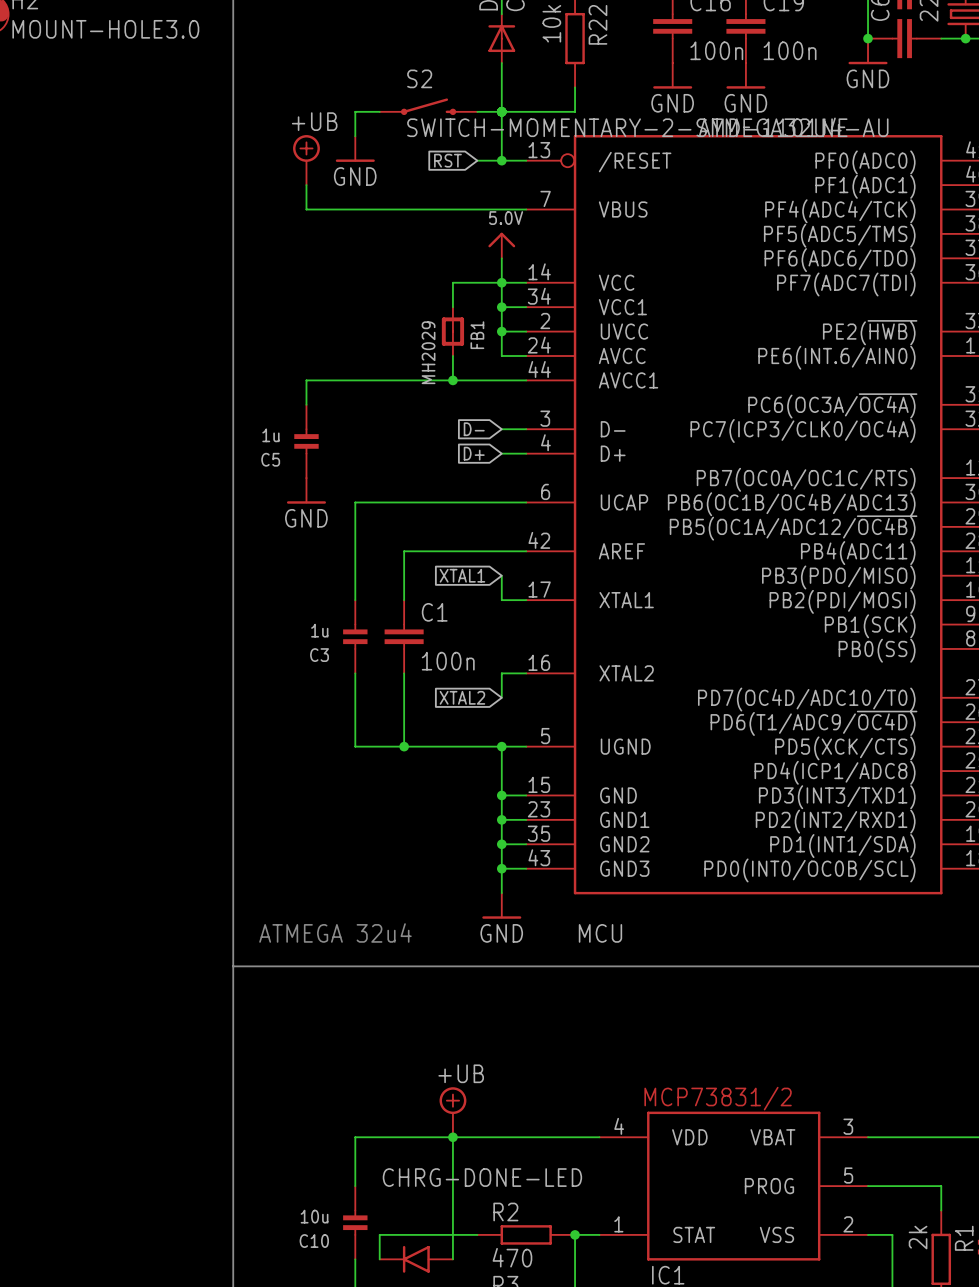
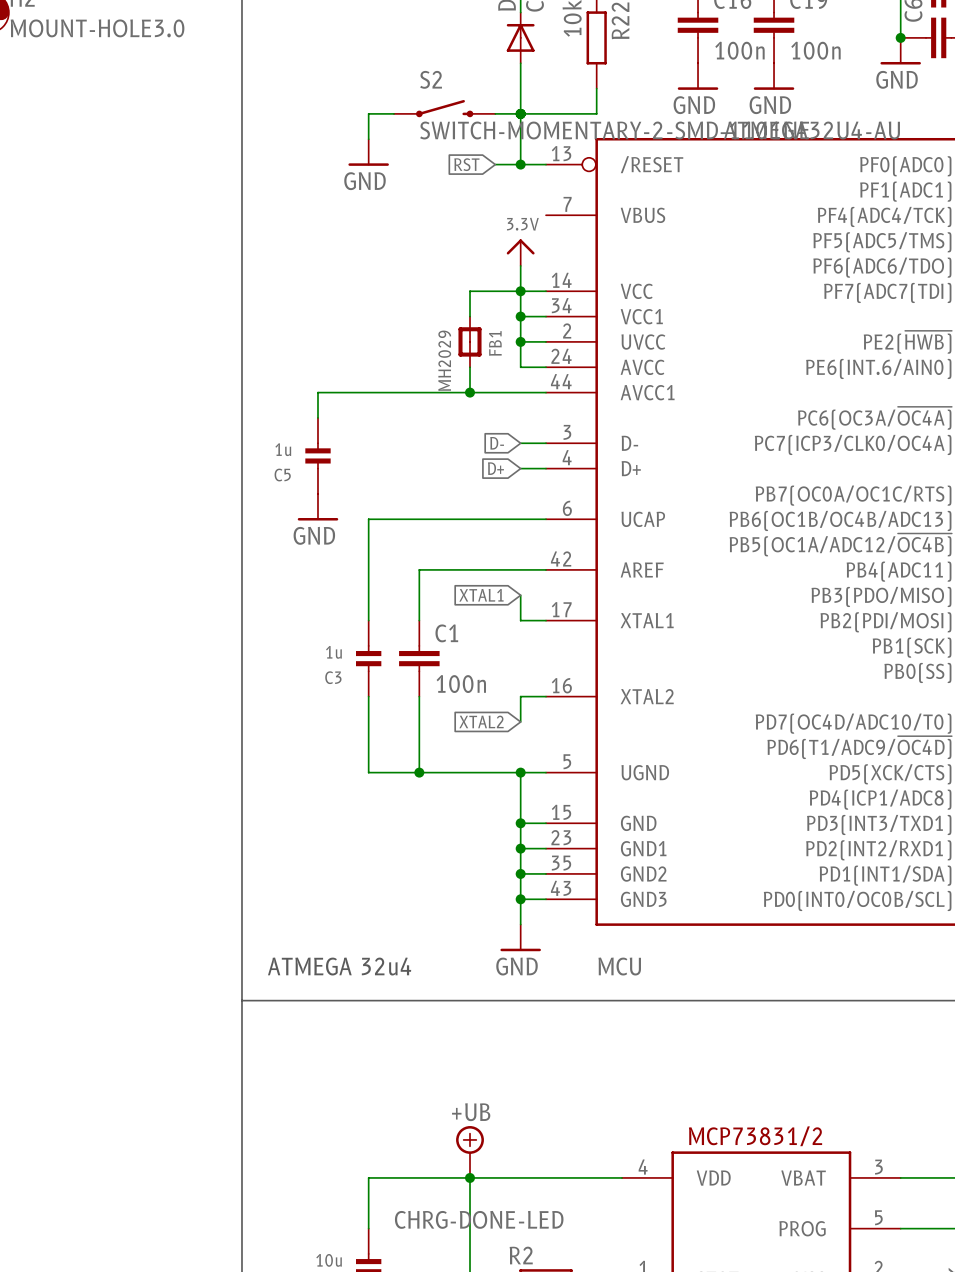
power symbol: +UB (306, 160) -> none
wire: (306, 185) (306, 209) (526, 209) -> none
power symbol: 5.0V (501, 245) -> 3.3V (520, 252)

